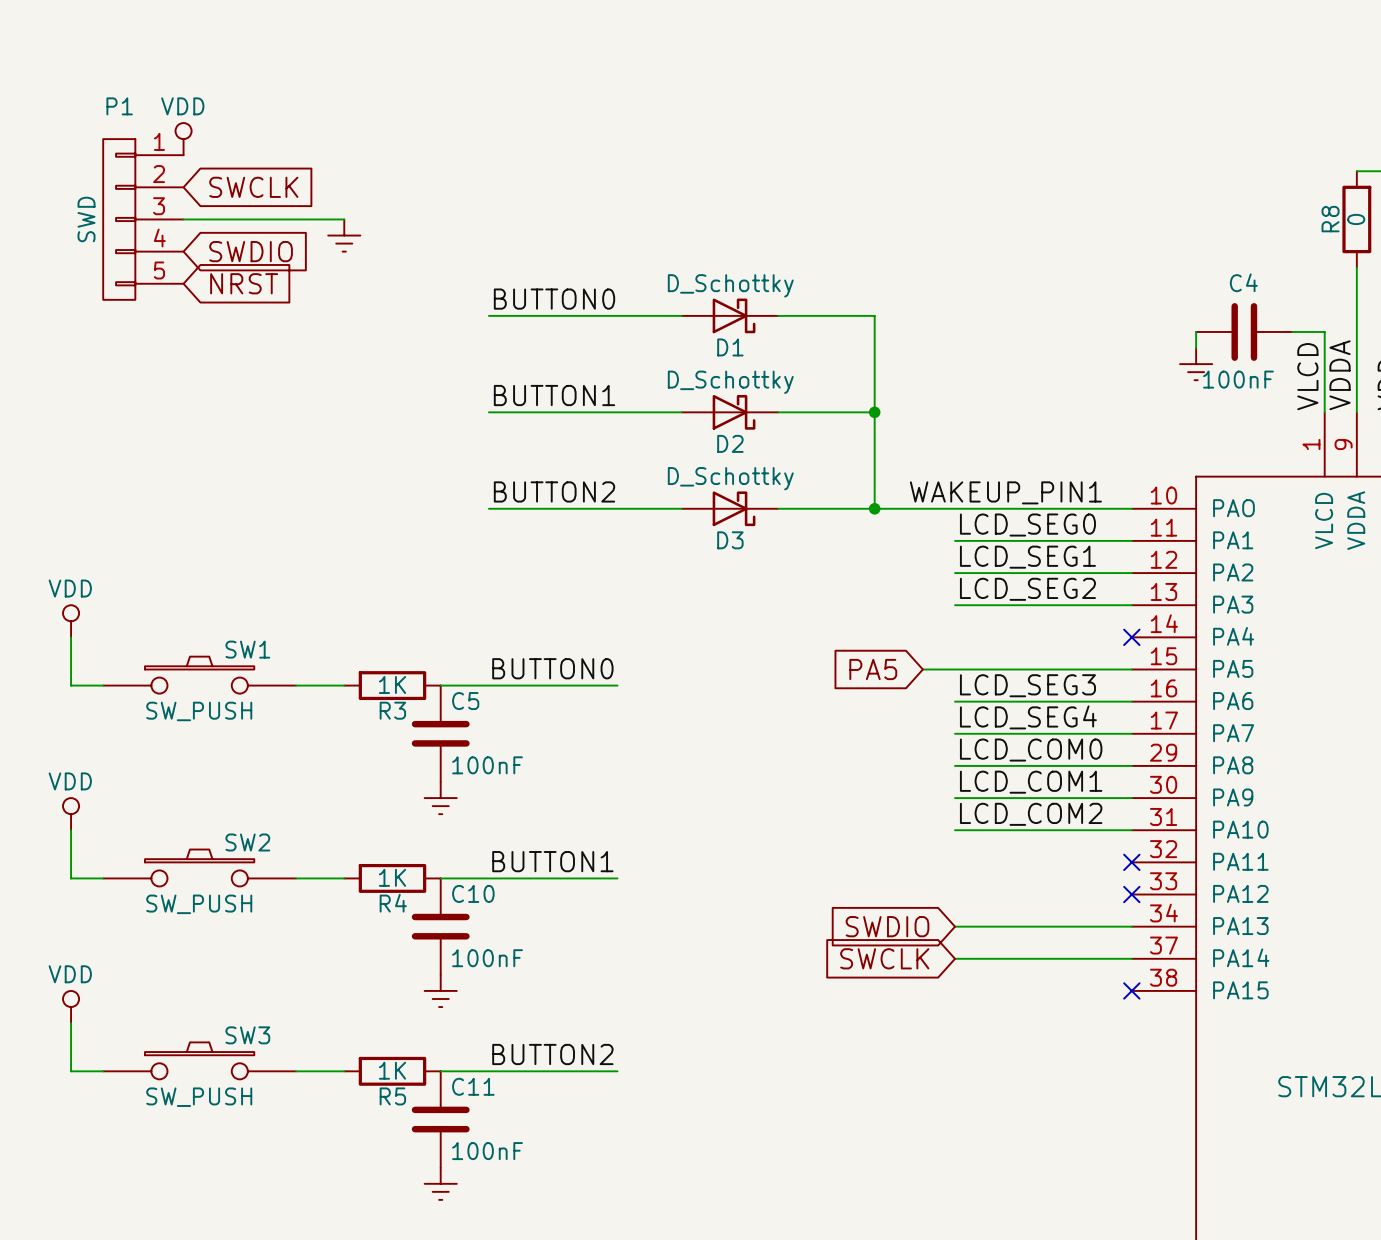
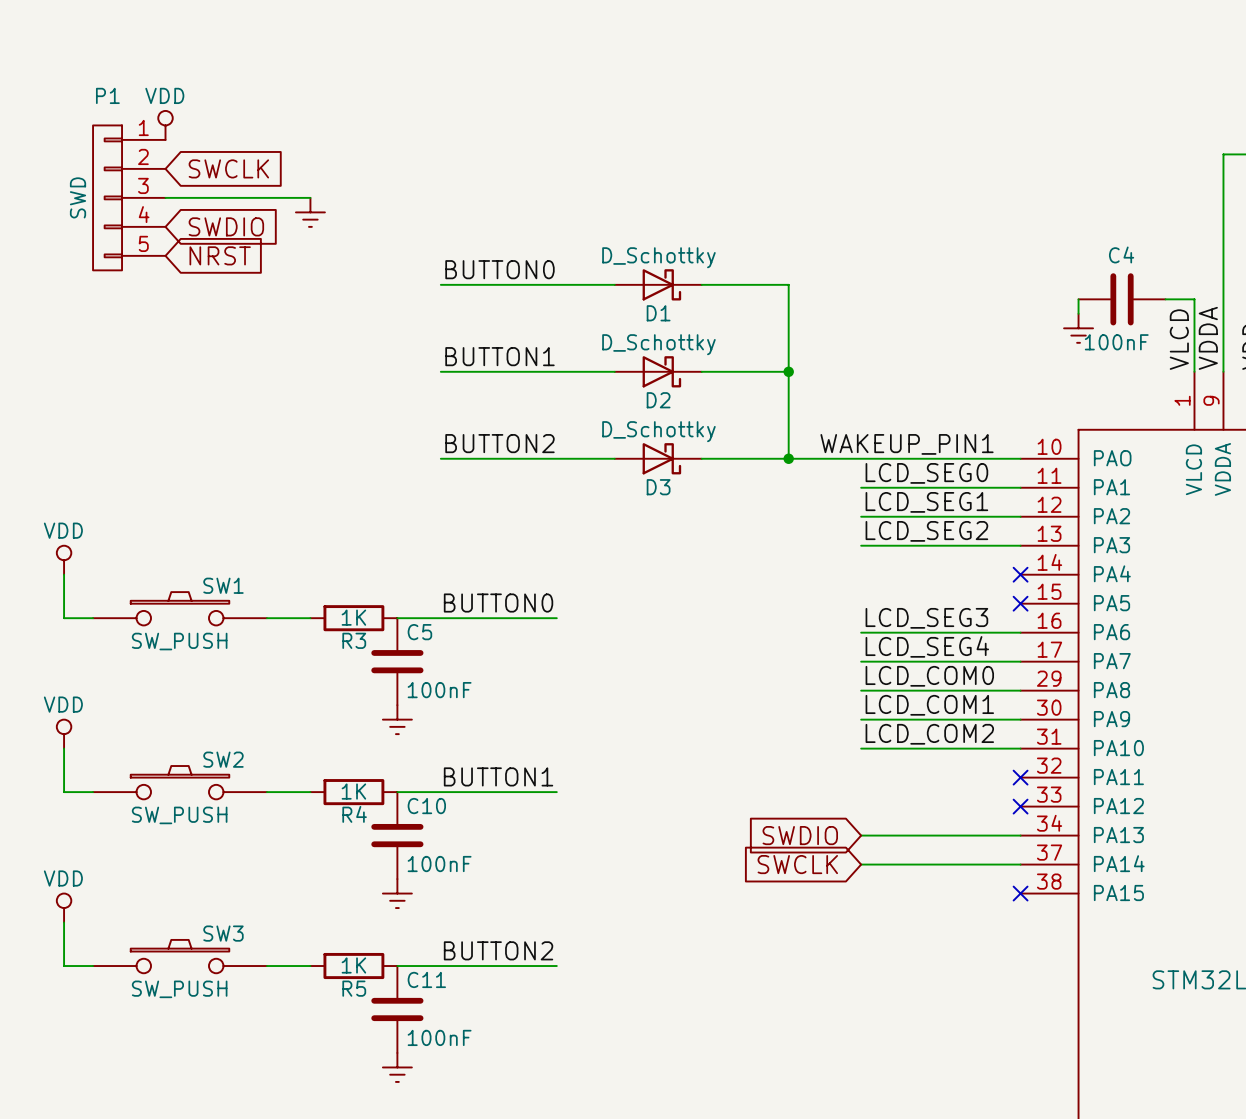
wire: none -> (1223, 154) (1223, 241)
R8: 0 (1356, 219) -> none
global label: PA5 (873, 669) -> none
wire: (922, 669) (1131, 669) -> none
no-connect mark: none -> (1020, 603)

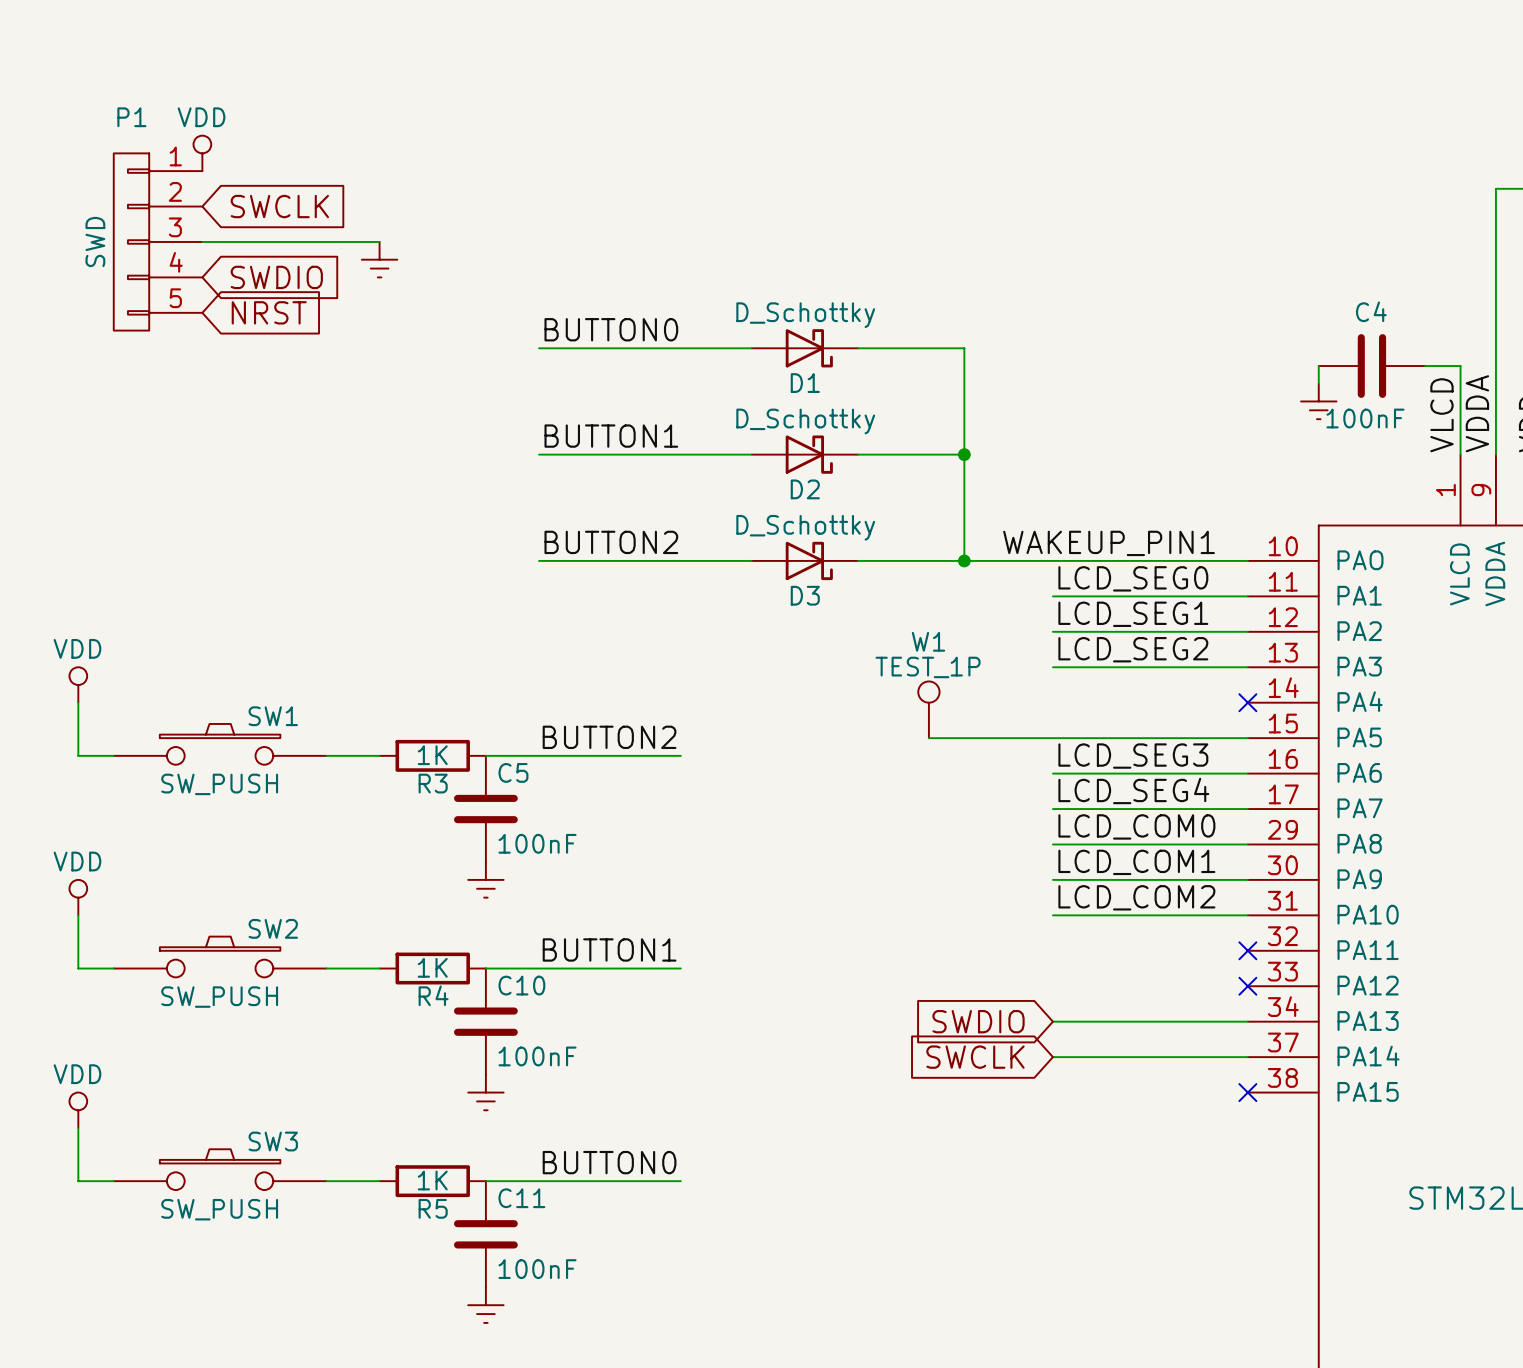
W1: none -> TEST_1P (928, 709)
label: BUTTON0 (498, 603) -> BUTTON2 (609, 737)
wire: none -> (928, 738) (1247, 738)
no-connect mark: (1020, 603) -> none
label: BUTTON2 (498, 950) -> BUTTON0 (609, 1162)

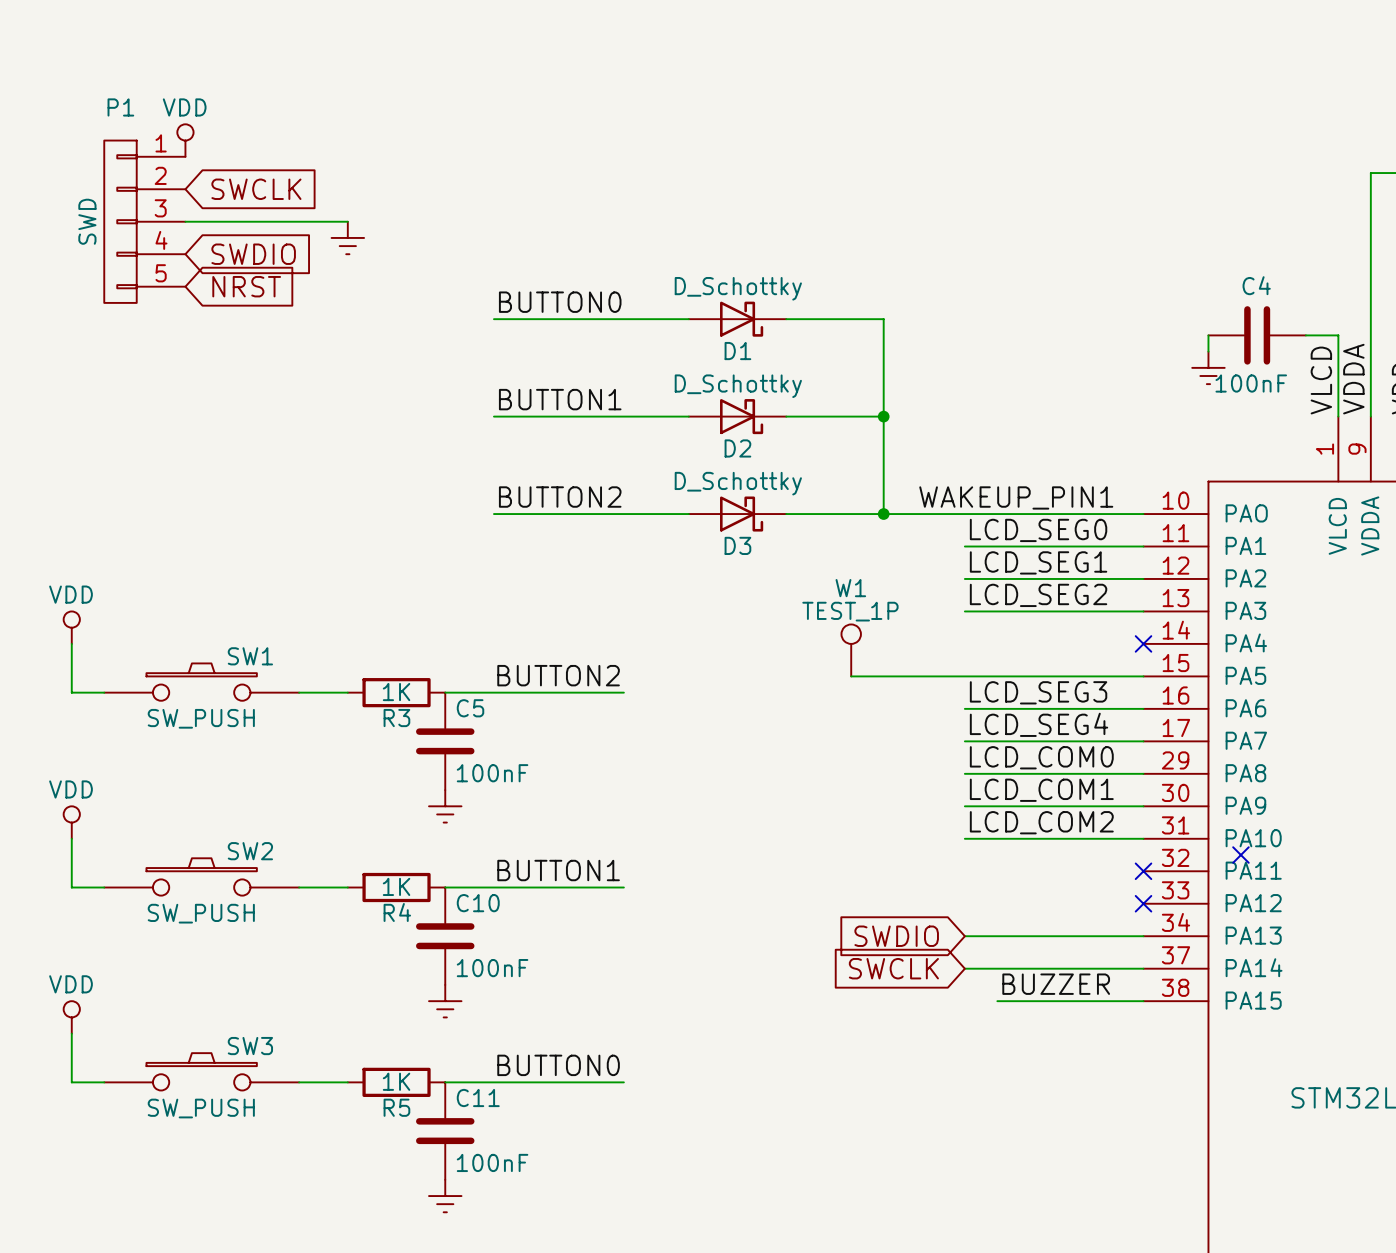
no-connect mark: none -> (1240, 855)
label: none -> BUZZER (1056, 984)
wire: none -> (997, 1001) (1143, 1001)
no-connect mark: (1247, 1092) -> none

